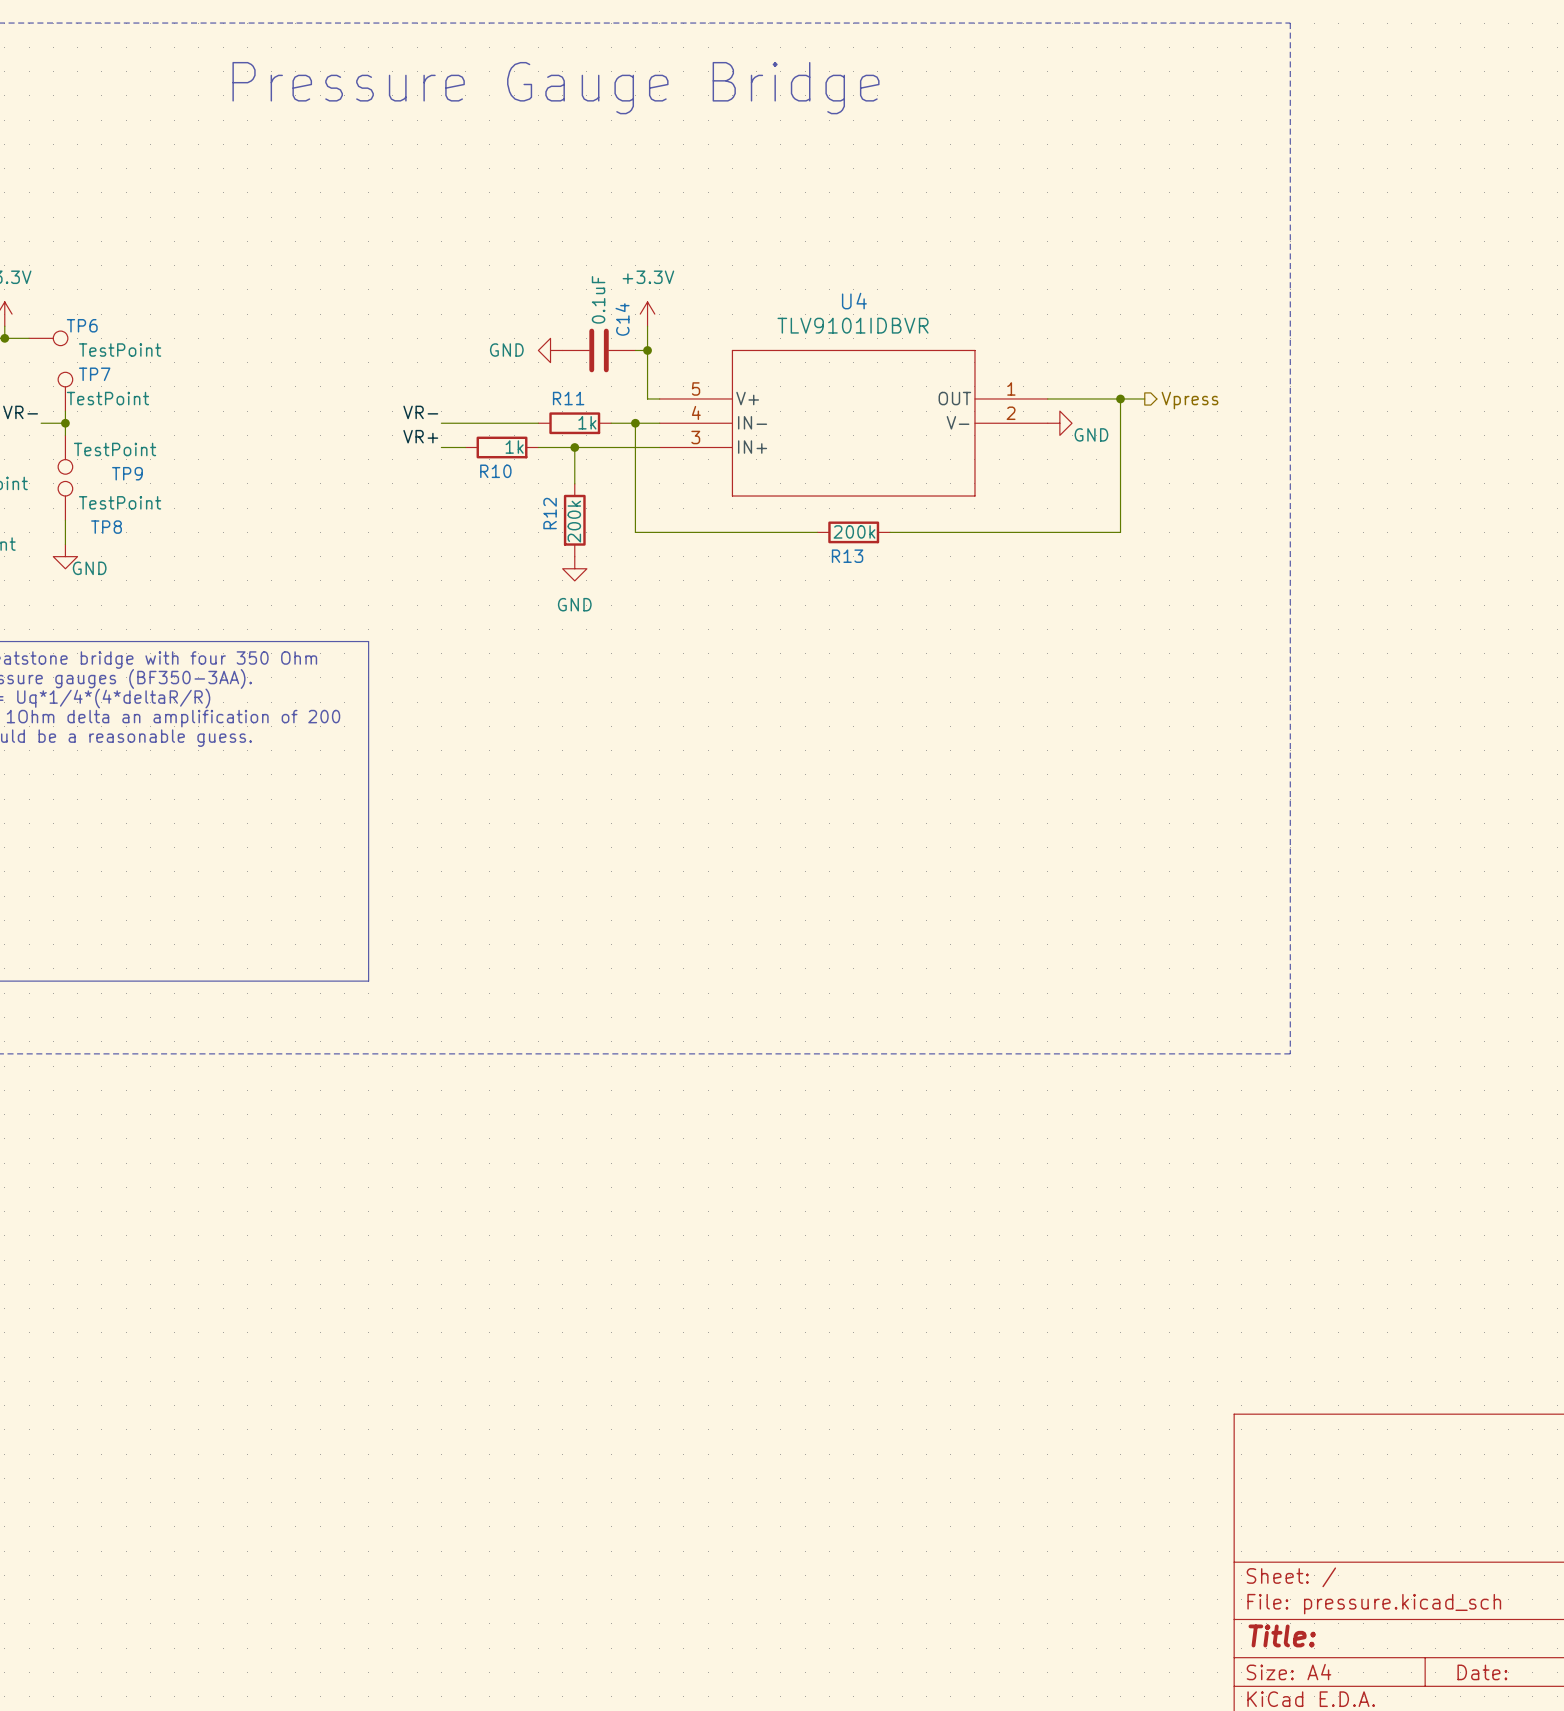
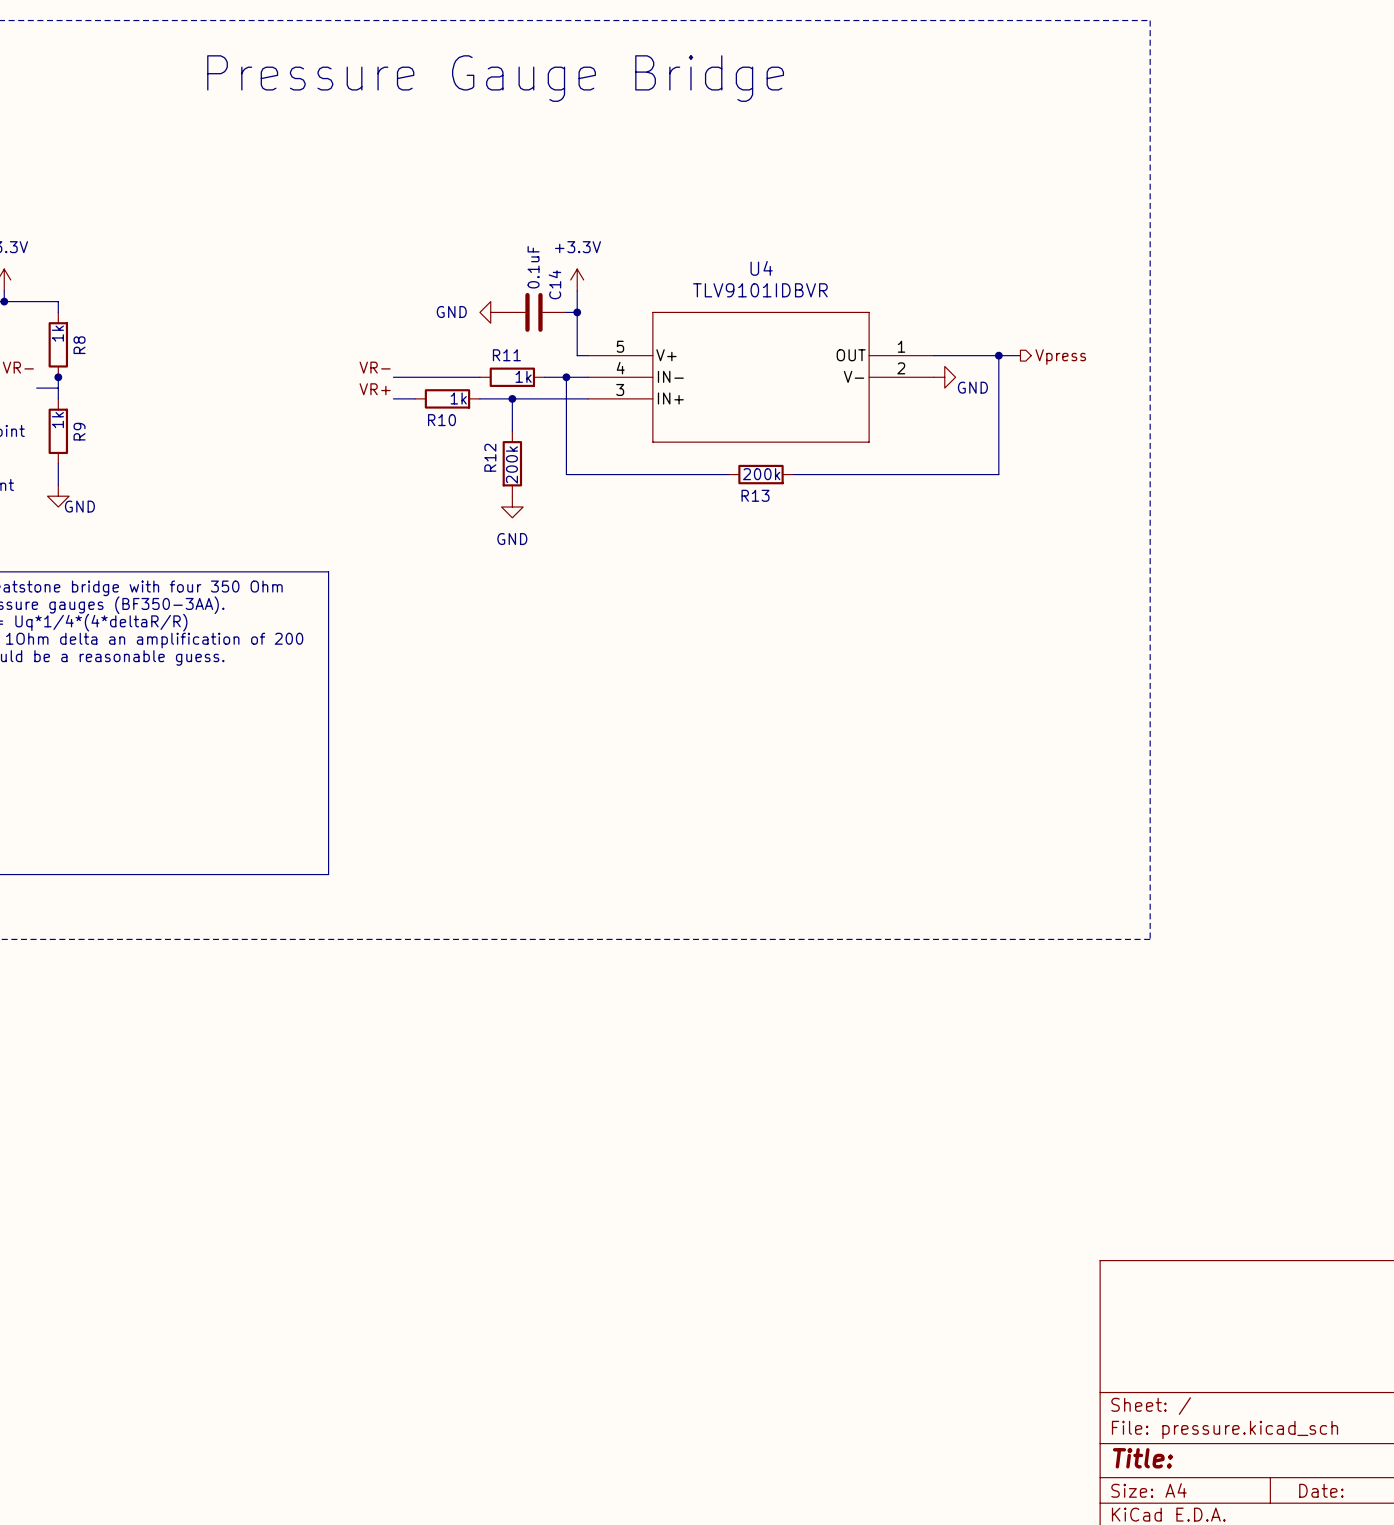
wire: none -> (25, 301) (58, 301) (58, 312)
TP6: TestPoint (48, 338) -> none
R8: none -> 1k (58, 344)
TP7: TestPoint (65, 391) -> none
wire: (65, 411) (65, 423) (41, 423) -> none
wire: none -> (36, 388) (58, 388) (58, 398)
TP9: TestPoint (65, 454) -> none
R9: none -> 1k (58, 431)
TP8: TestPoint (65, 500) -> none

